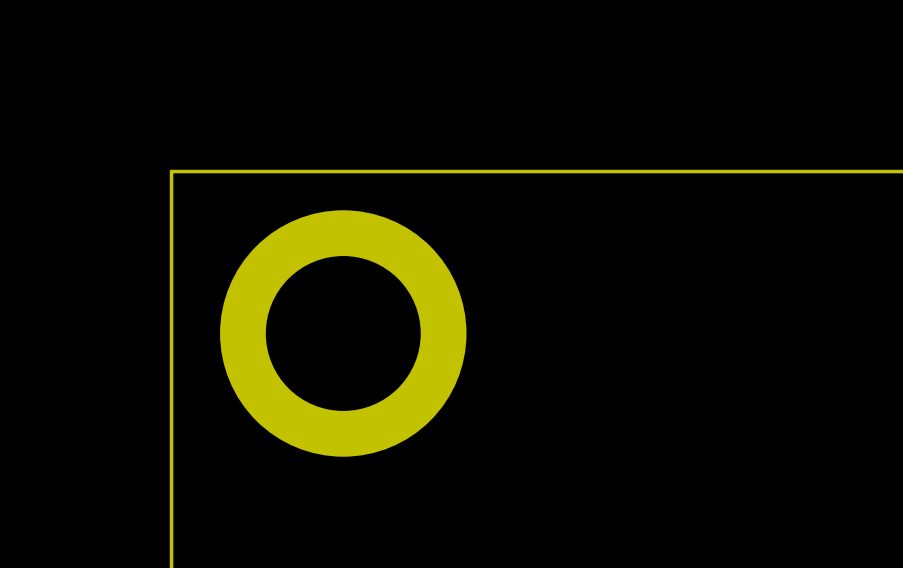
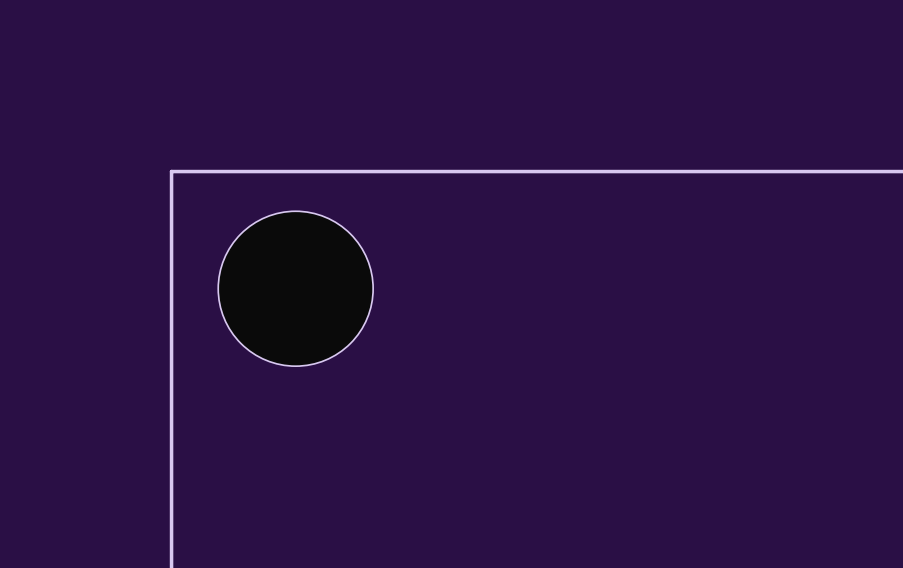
part footprint: [220, 210, 467, 457] -> [218, 211, 374, 367]

